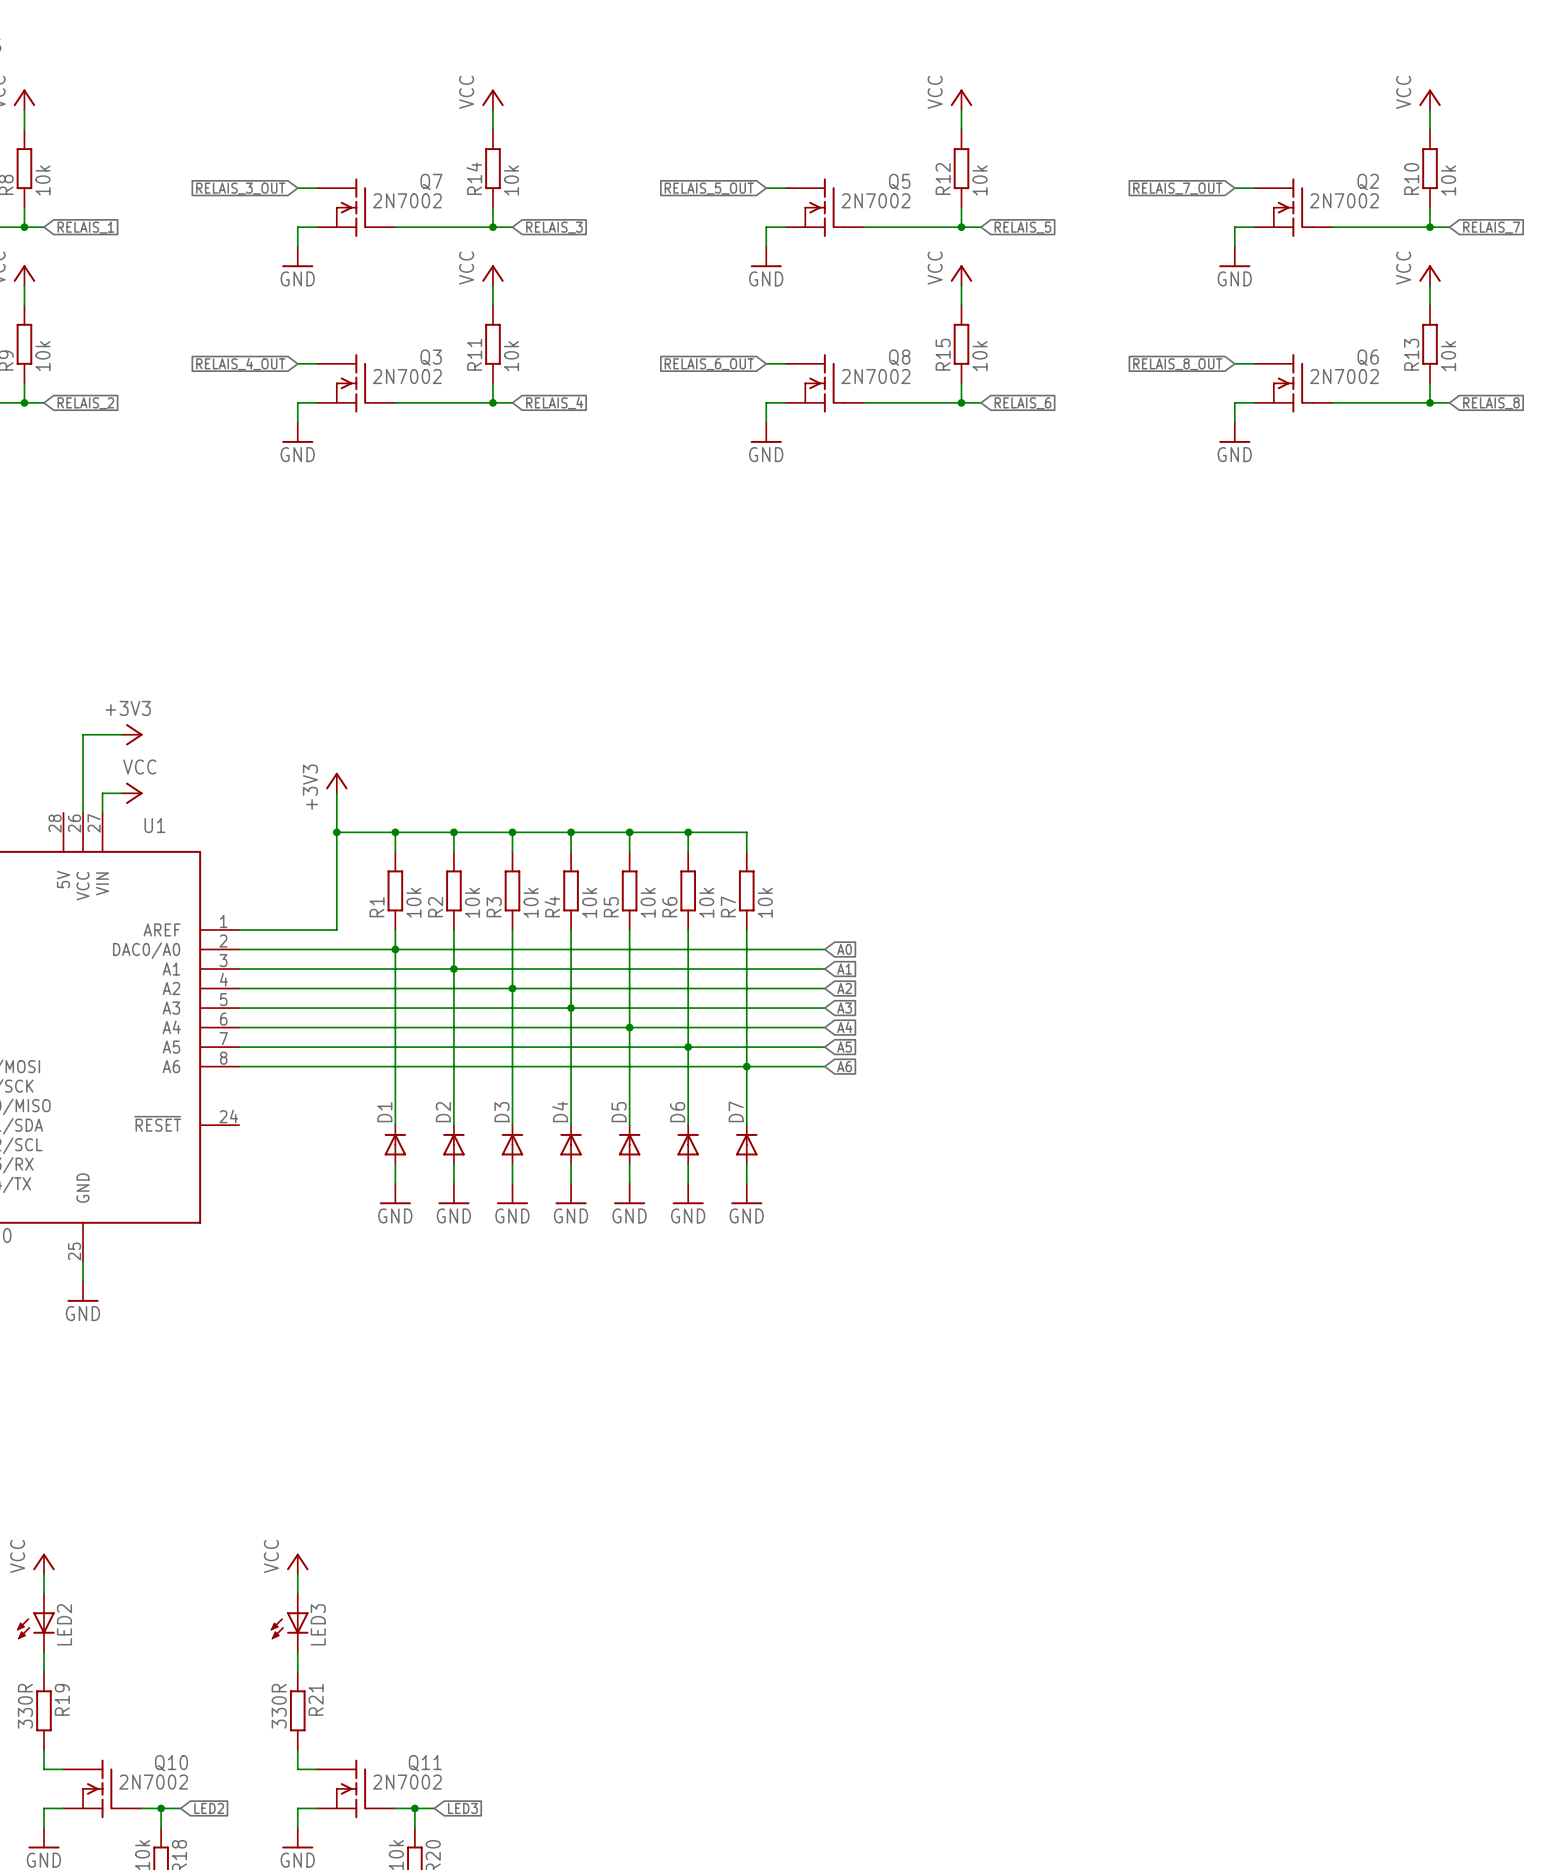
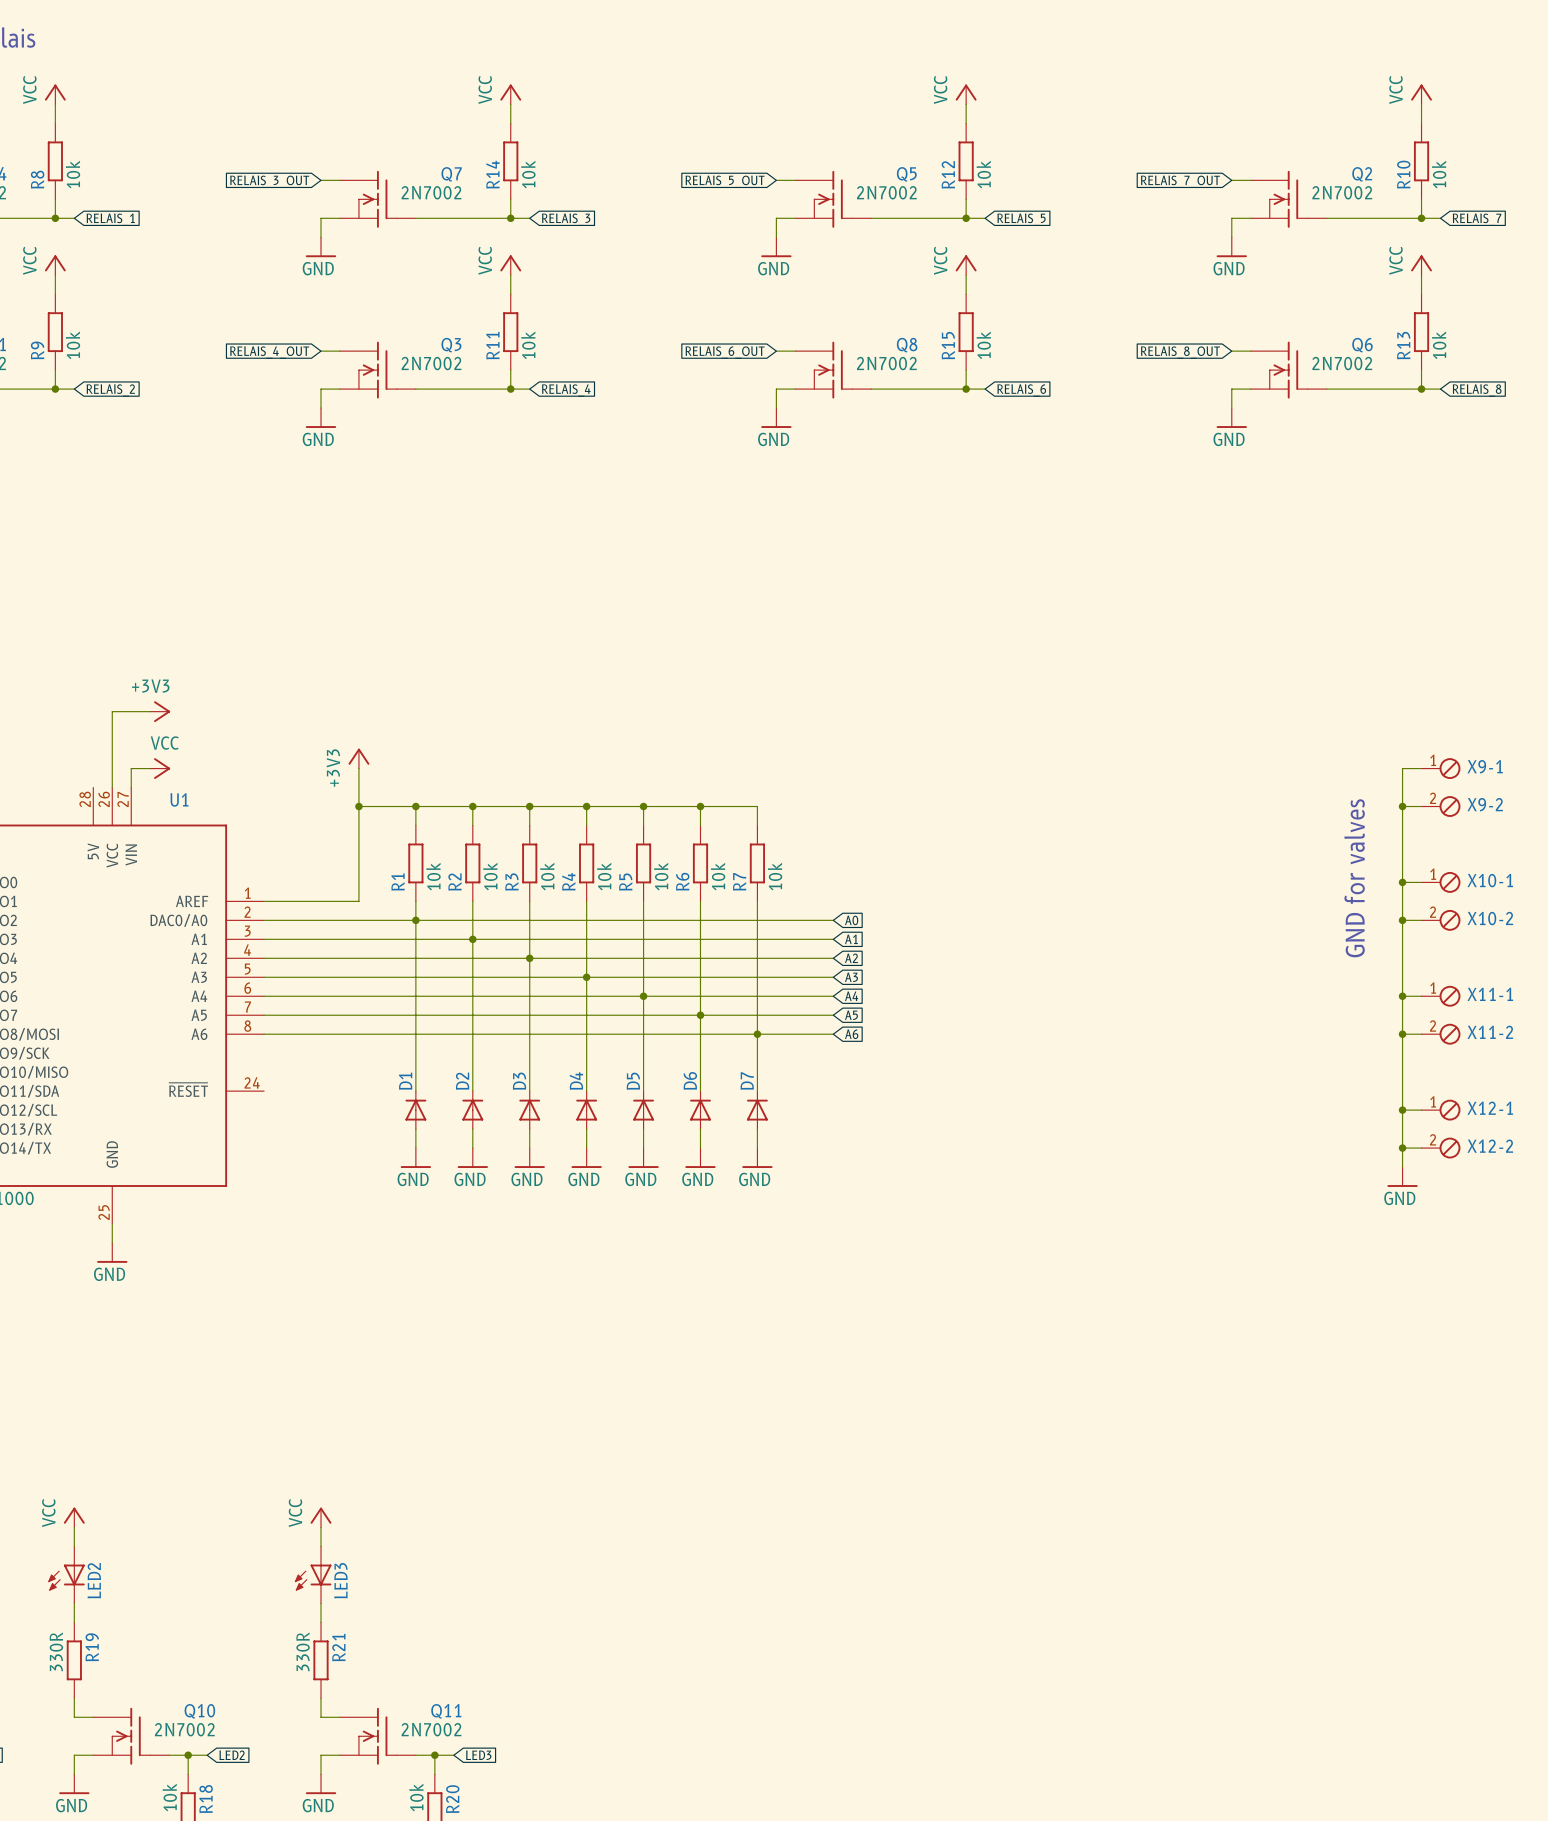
wire: none -> (1421, 768) (1402, 768) (1402, 1167)
X9-1: none -> (1440, 768)
wire: none -> (1402, 806) (1421, 806)
junction: none -> (1402, 806)
X9-2: none -> (1440, 806)
text: none -> GND for valves (1354, 878)
wire: none -> (1402, 882) (1421, 882)
junction: none -> (1402, 882)
X10-1: none -> (1440, 882)
wire: none -> (1402, 920) (1421, 920)
junction: none -> (1402, 920)
X10-2: none -> (1440, 920)
wire: none -> (1402, 996) (1421, 996)
junction: none -> (1402, 996)
X11-1: none -> (1440, 996)
wire: none -> (1402, 1034) (1421, 1034)
junction: none -> (1402, 1034)
X11-2: none -> (1440, 1034)
wire: none -> (1402, 1110) (1421, 1110)
junction: none -> (1402, 1110)
X12-1: none -> (1440, 1110)
wire: none -> (1402, 1148) (1421, 1148)
junction: none -> (1402, 1148)
X12-2: none -> (1440, 1148)
power symbol: none -> GND (1402, 1176)

